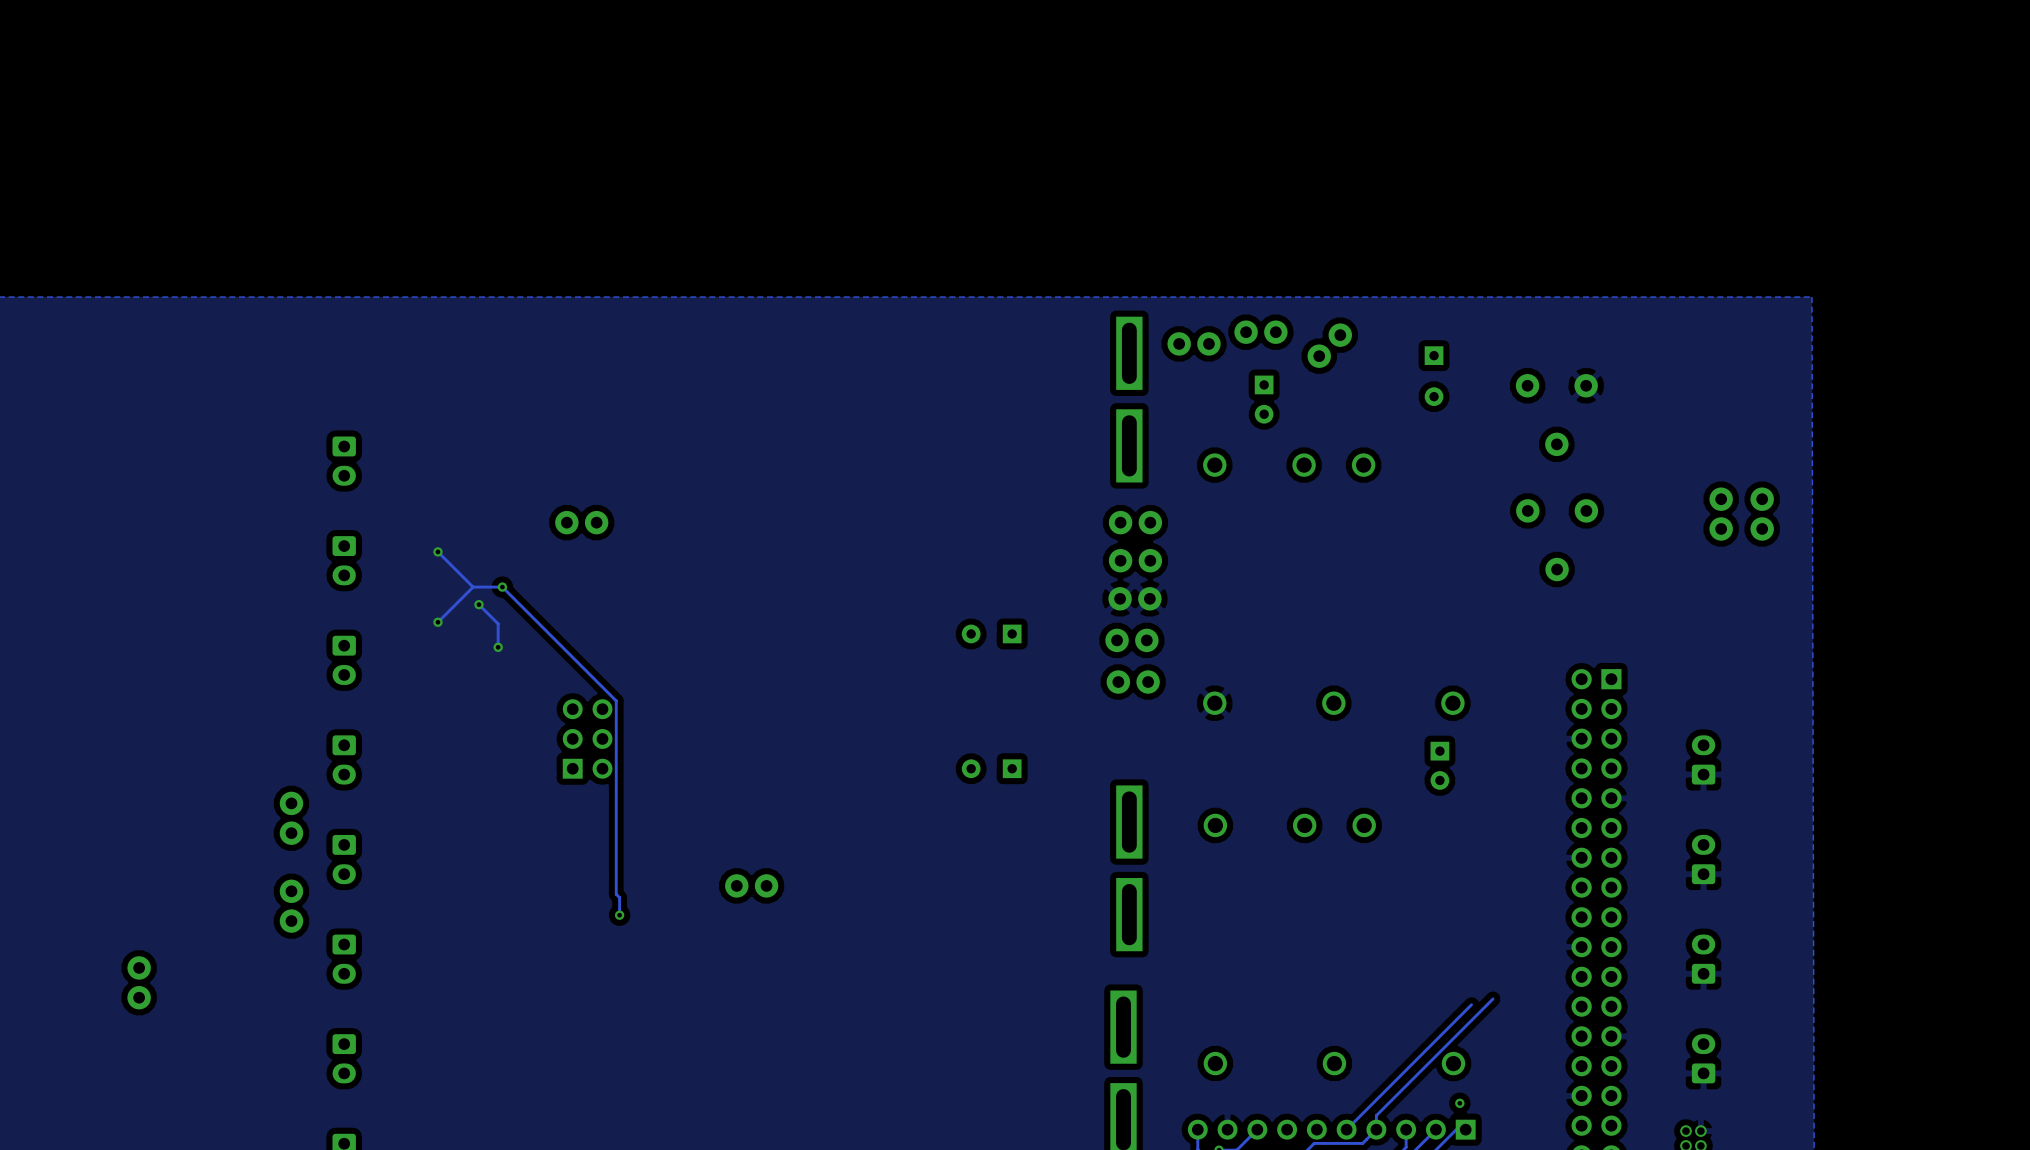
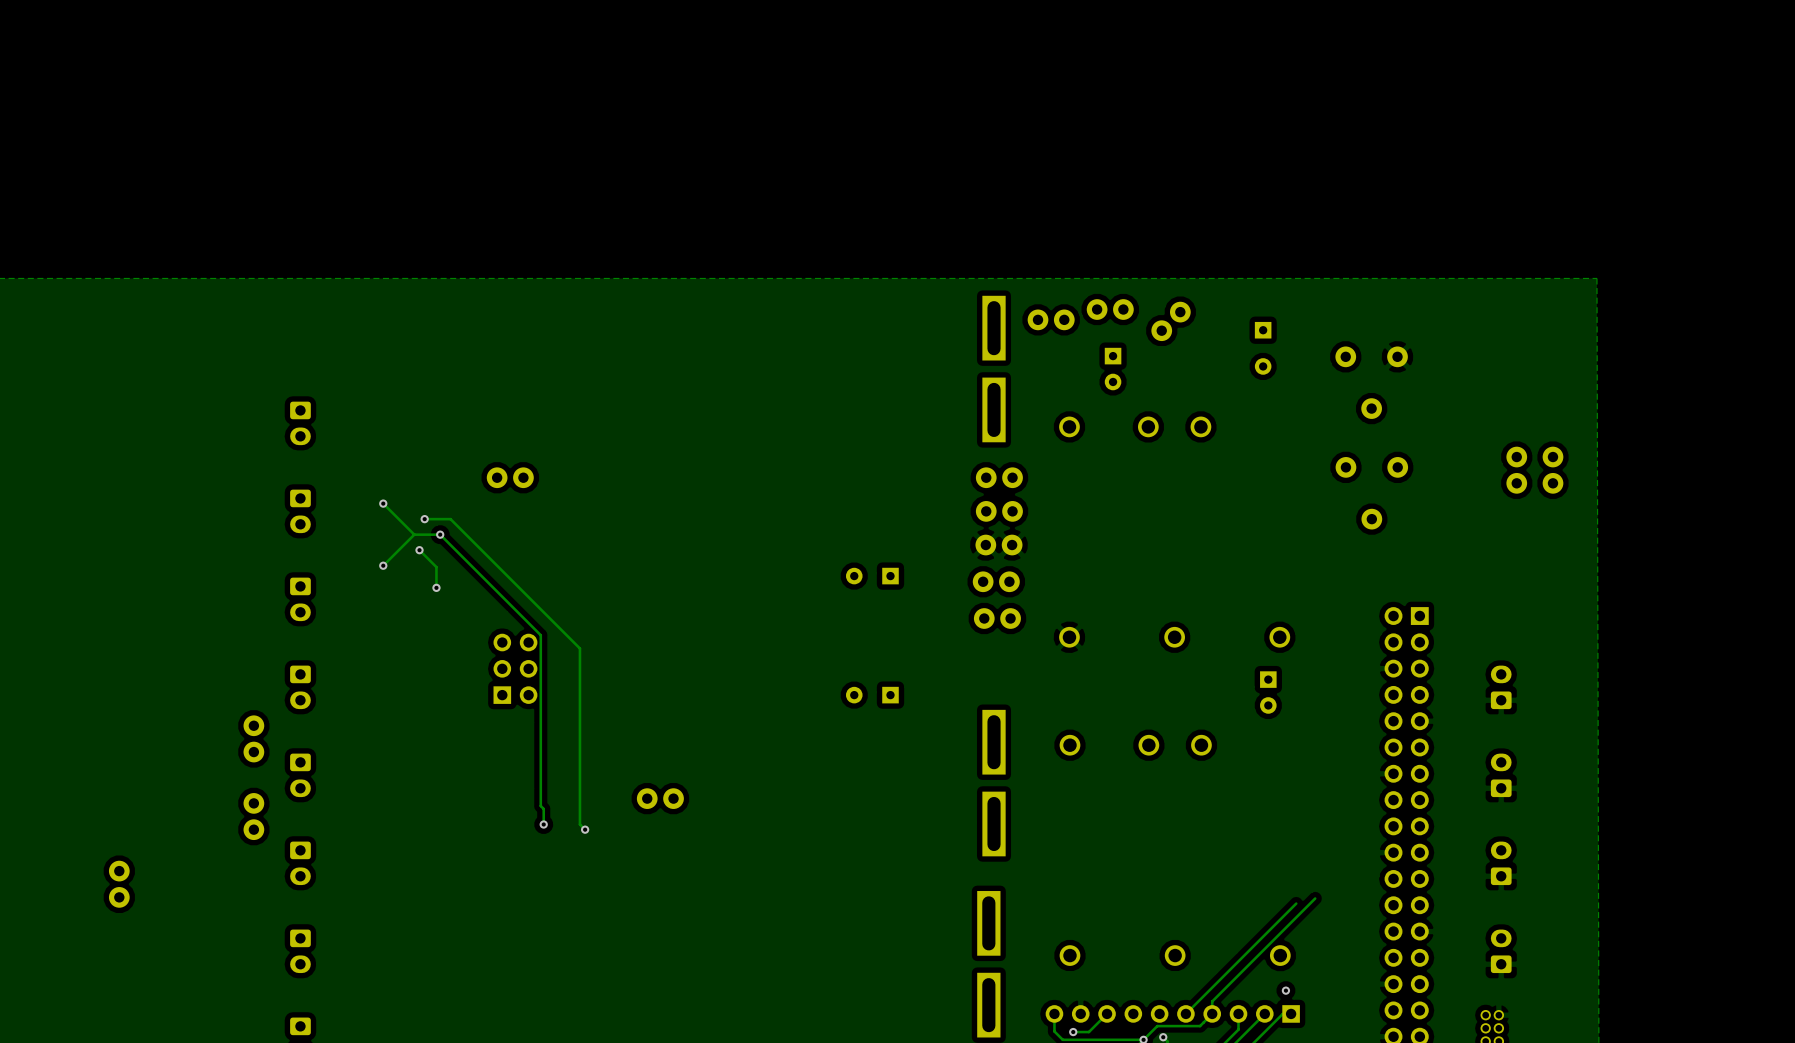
track: none -> (424, 519) (450, 519) (579, 648) (579, 824) (585, 829)
via: none -> (424, 519)
via: none -> (585, 829)

